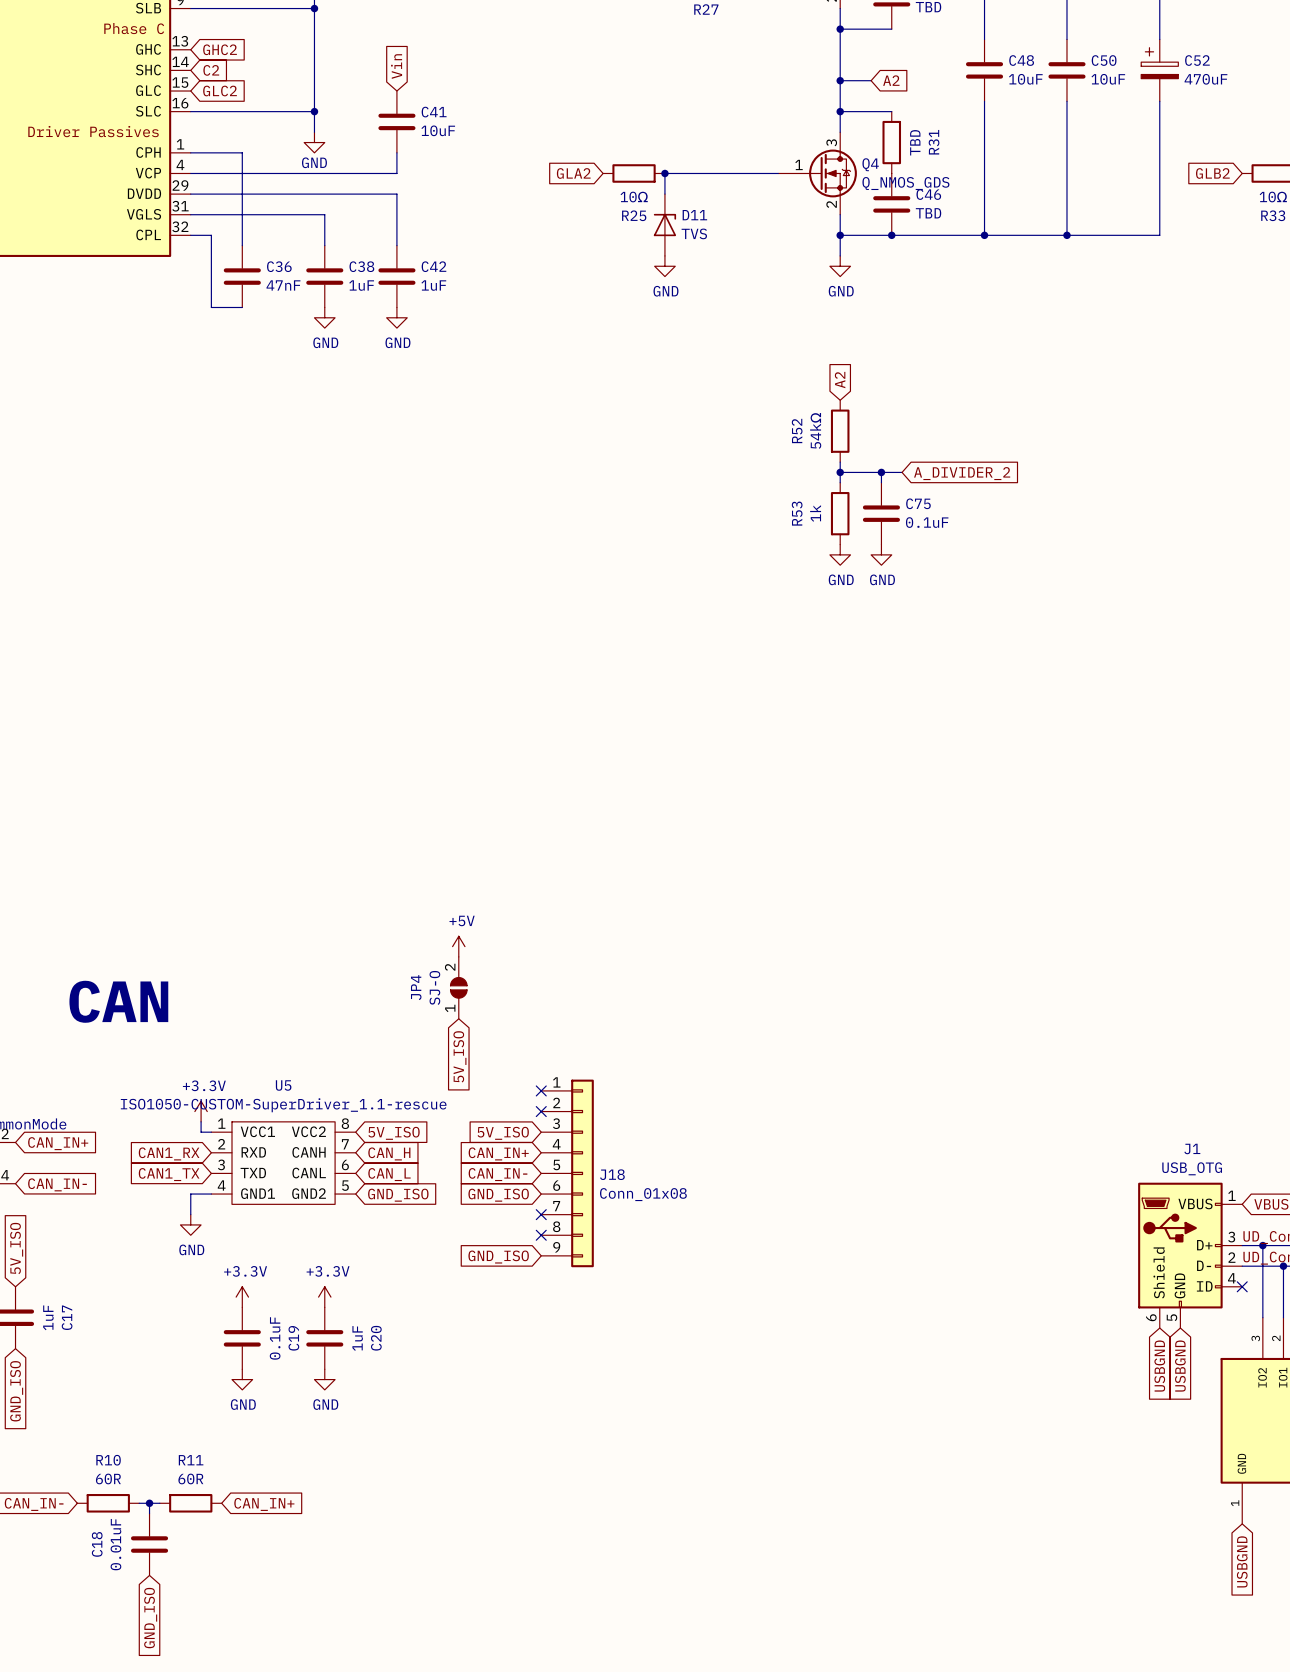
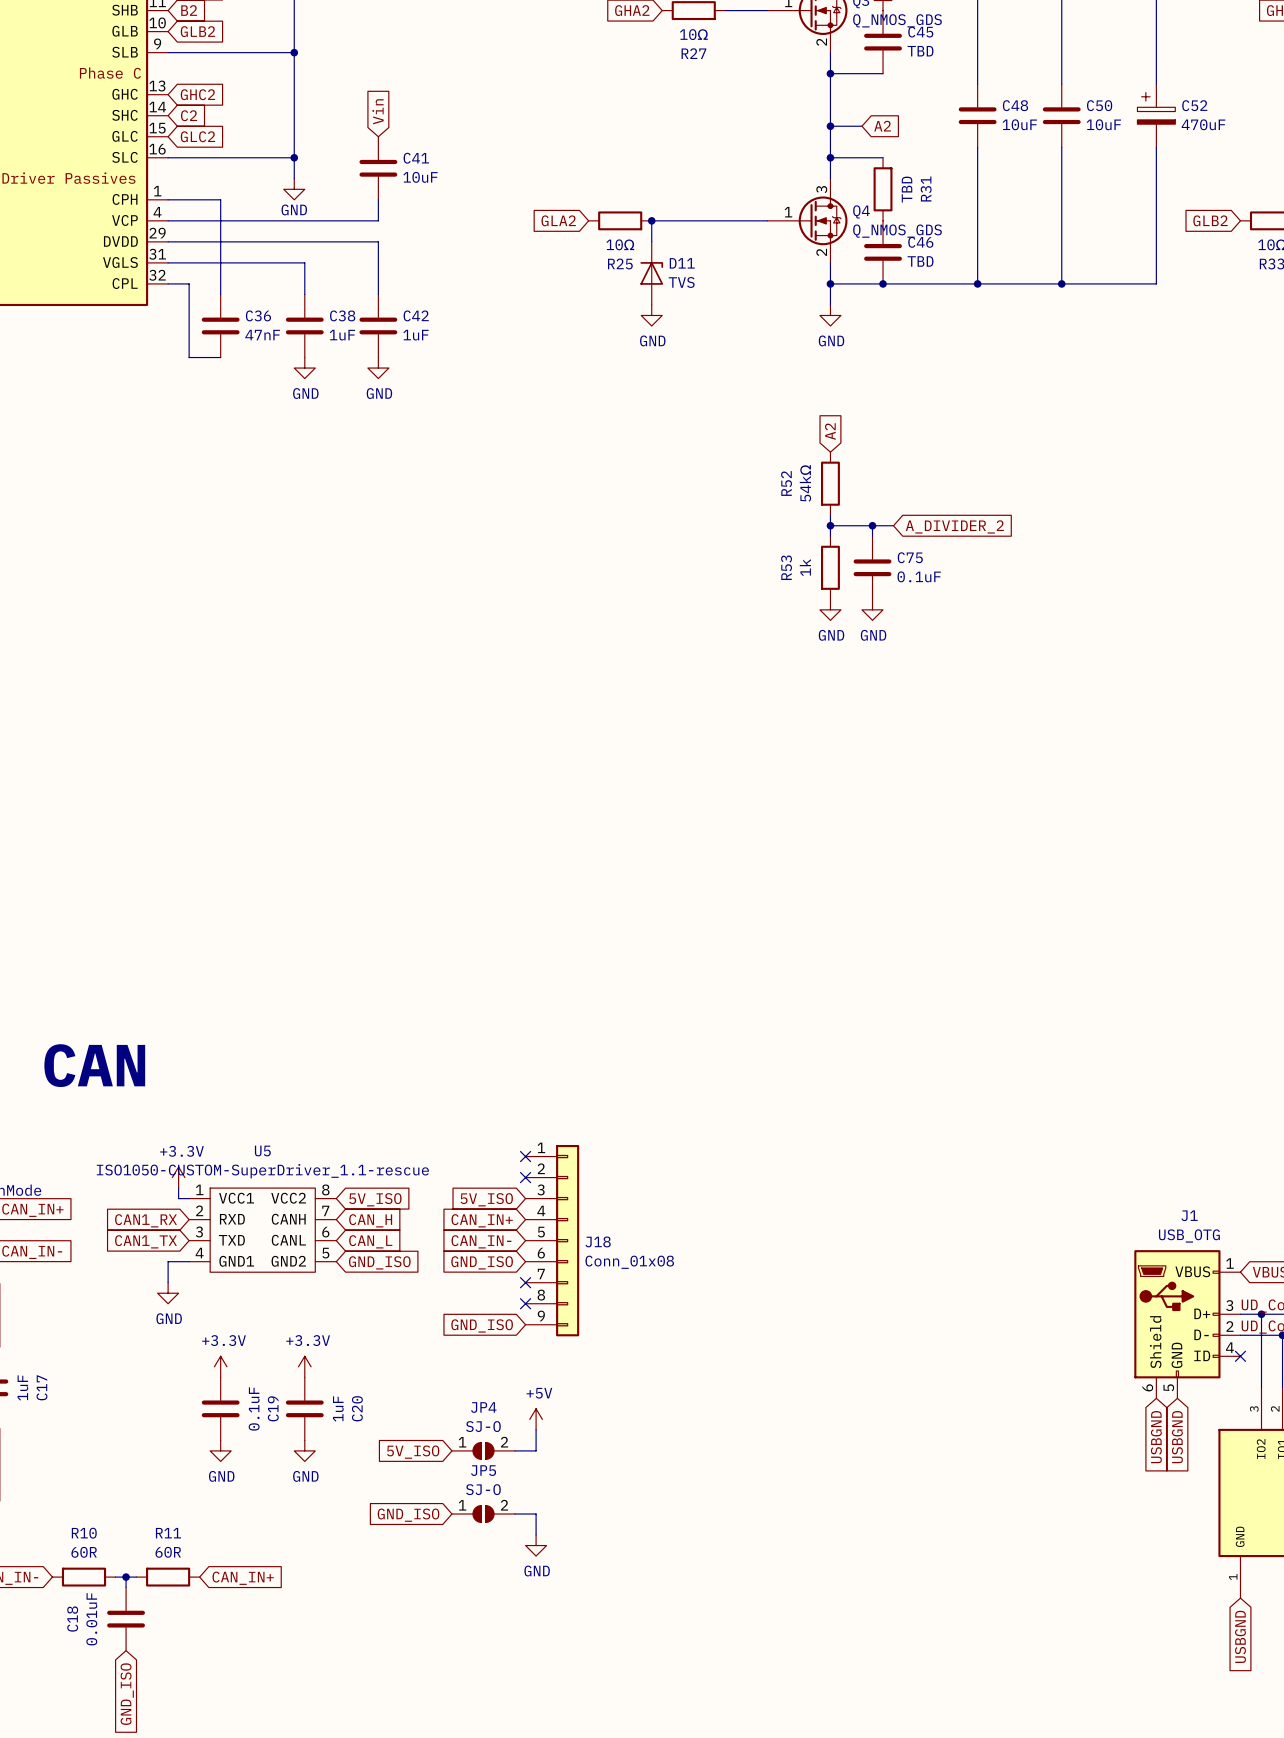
power symbol: +5V (458, 946) -> none
JP4 rotation: 0° (458, 987) -> 90° clockwise (483, 1450)
JP4 position: (458, 987) -> (483, 1450)
global label: 5V_ISO (459, 1056) -> none
power symbol: none -> +5V (536, 1419)
wire: none -> (536, 1429) (536, 1450) (515, 1450)
global label: none -> 5V_ISO (413, 1452)
JP5: none -> SJ-O (483, 1514)
wire: none -> (515, 1514) (536, 1514) (536, 1535)
global label: none -> GND_ISO (408, 1515)
power symbol: none -> GND (536, 1545)

